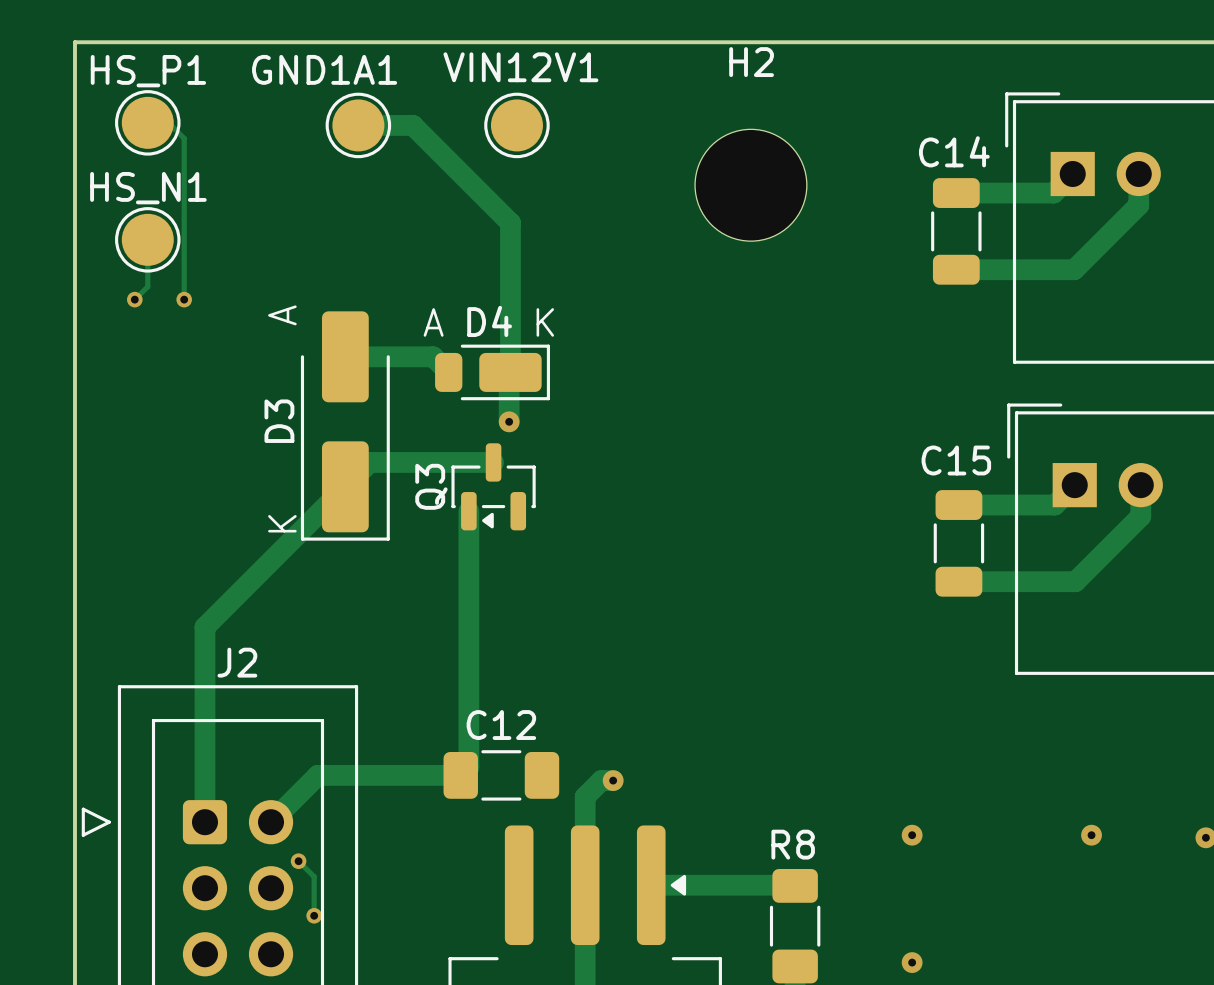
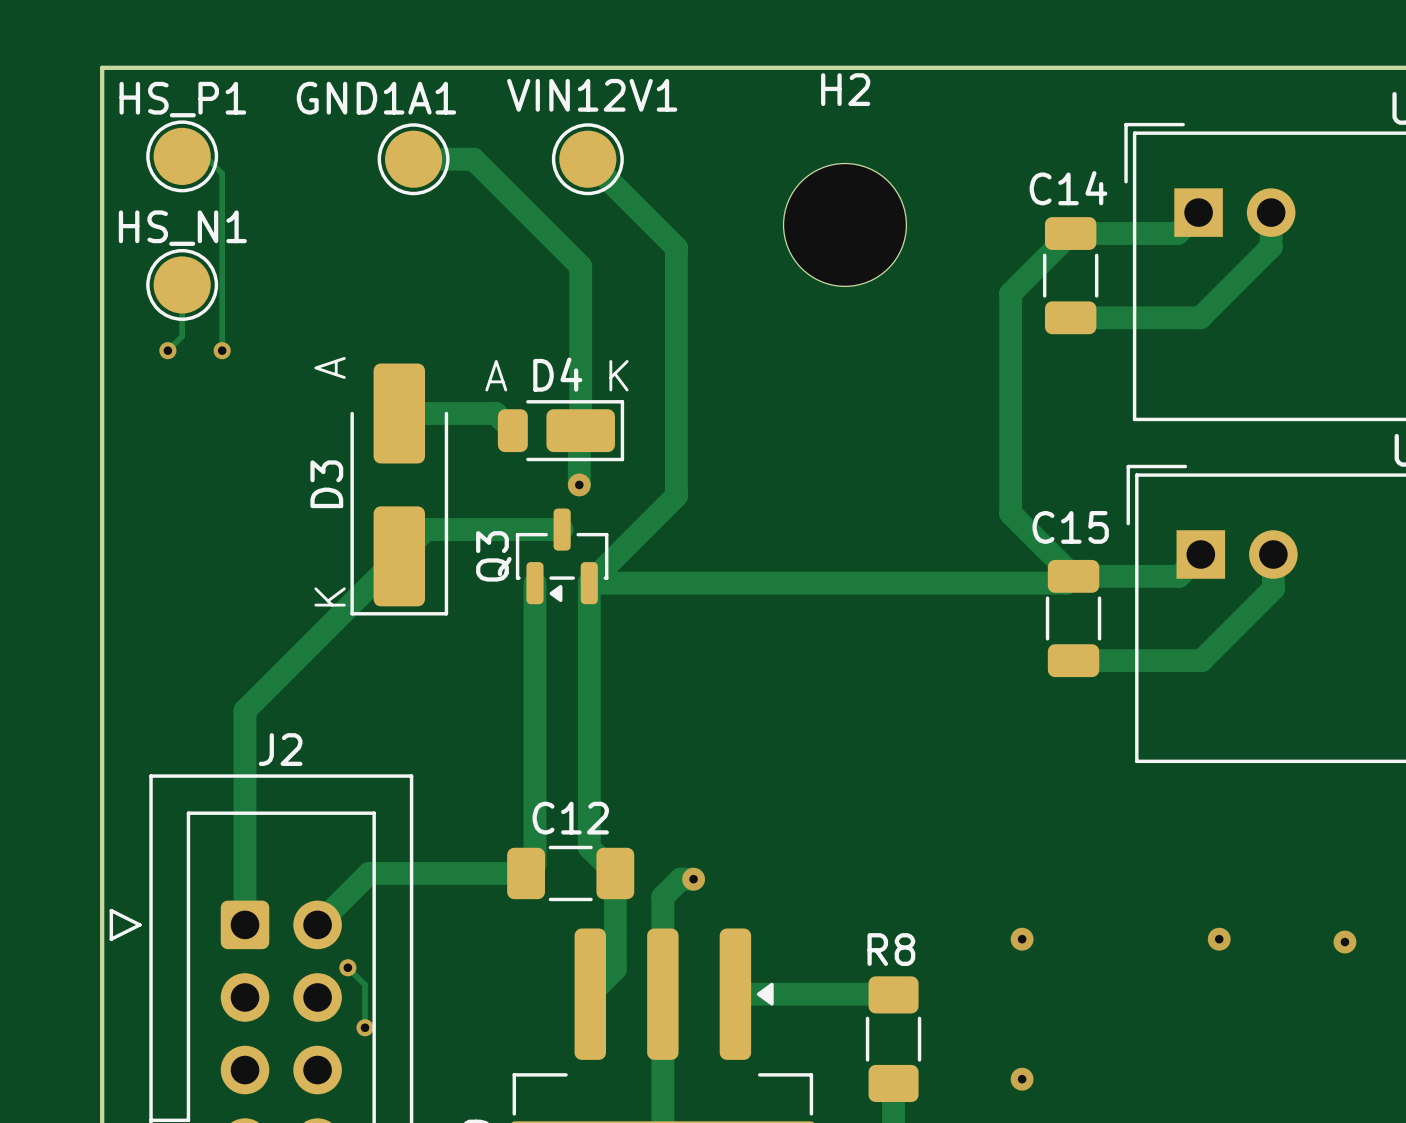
track: none -> (587, 159) (676, 247) (676, 496) (589, 583)
track: none -> (1070, 233) (1010, 293) (1010, 513) (1073, 576) (1066, 583) (589, 583)
track: none -> (589, 583) (589, 847) (615, 873) (615, 969) (590, 994)

